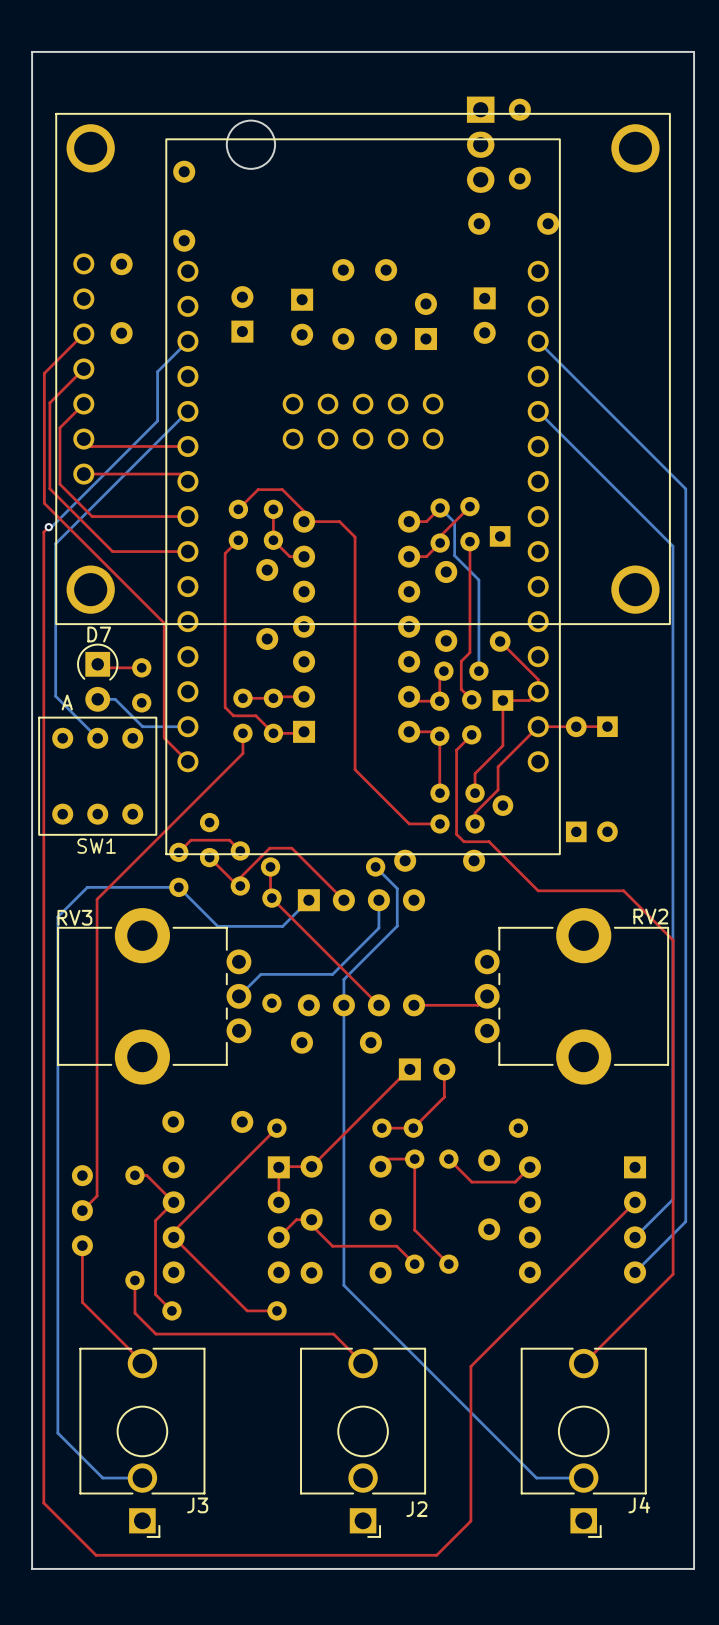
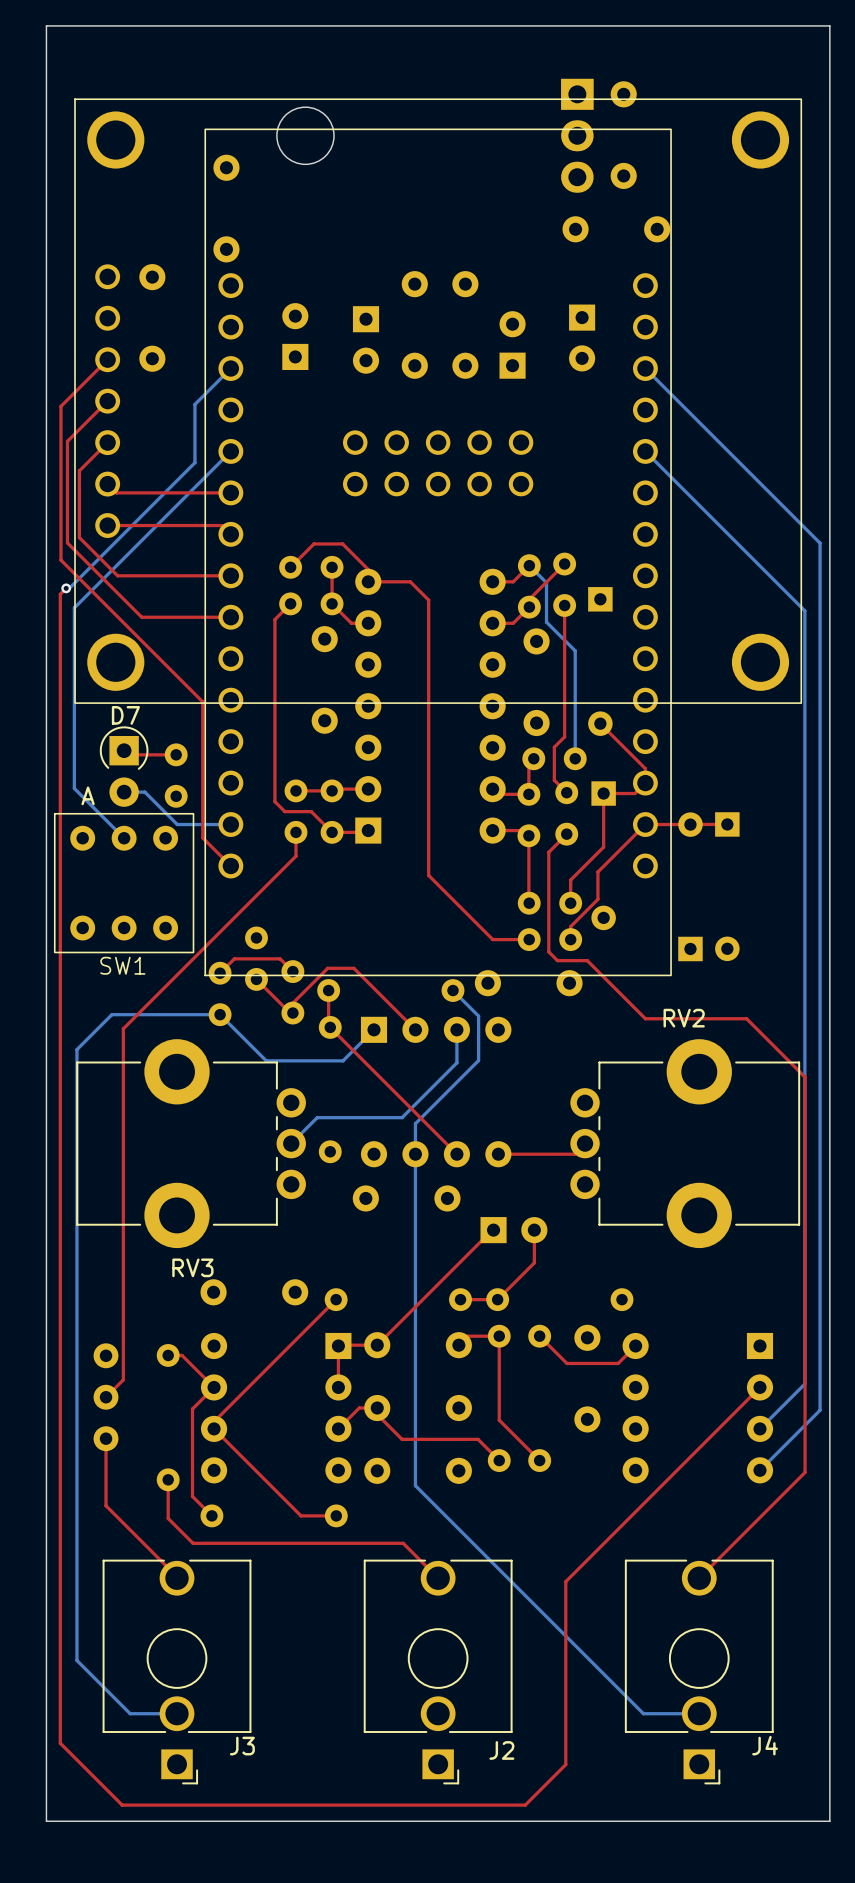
RV2 name position: RV2 (650, 916) -> RV2 (684, 1018)
RV3 name position: RV3 (74, 917) -> RV3 (192, 1267)

